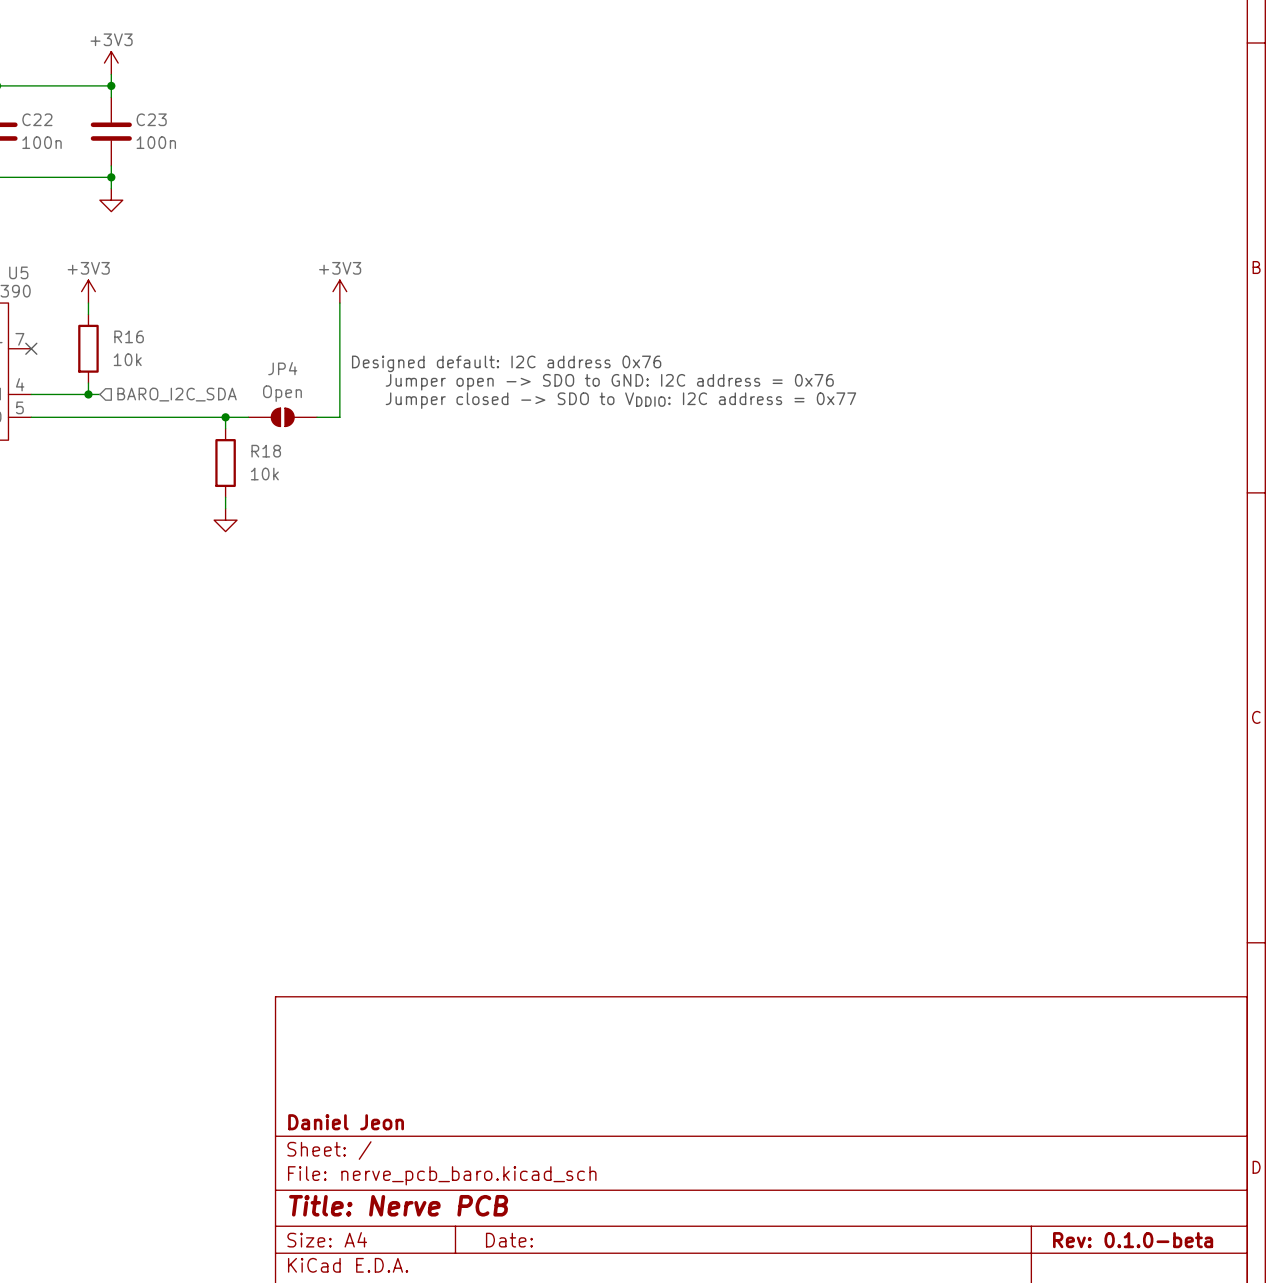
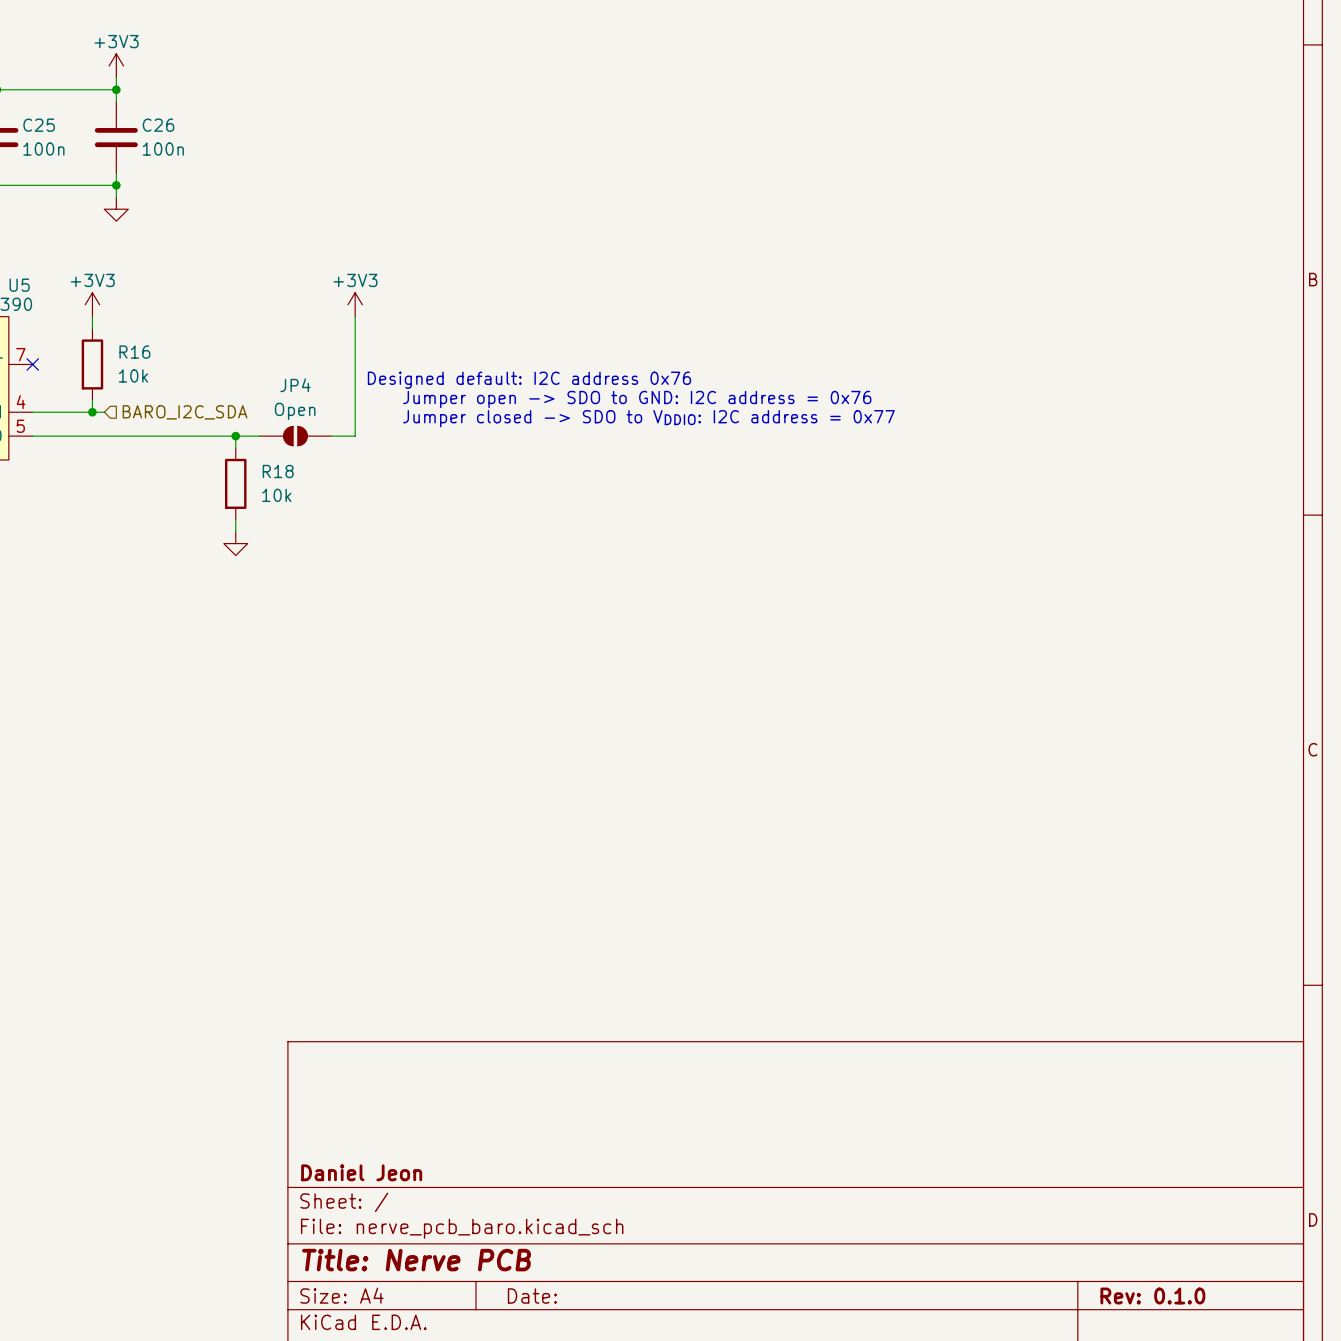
C22 name: C22 (37, 119) -> C25 (39, 125)
C23 name: C23 (151, 119) -> C26 (158, 125)
title block: Rev: 0.1.0-beta (1133, 1240) -> Rev: 0.1.0 (1152, 1296)

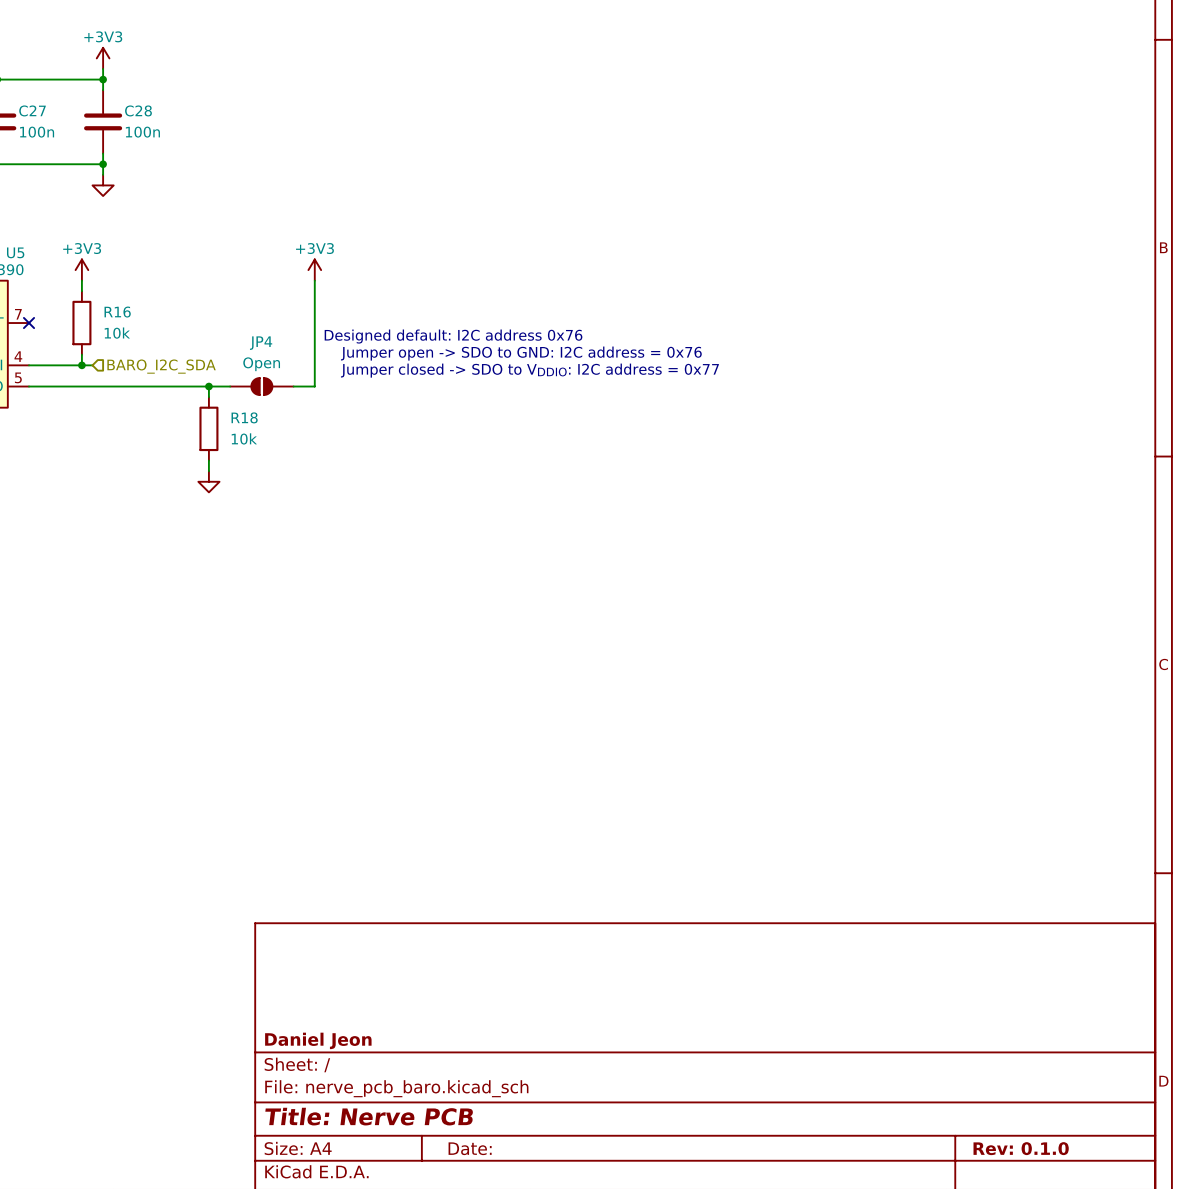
C25 name: C25 (39, 125) -> C27 (32, 110)
C26 name: C26 (158, 125) -> C28 (138, 110)

